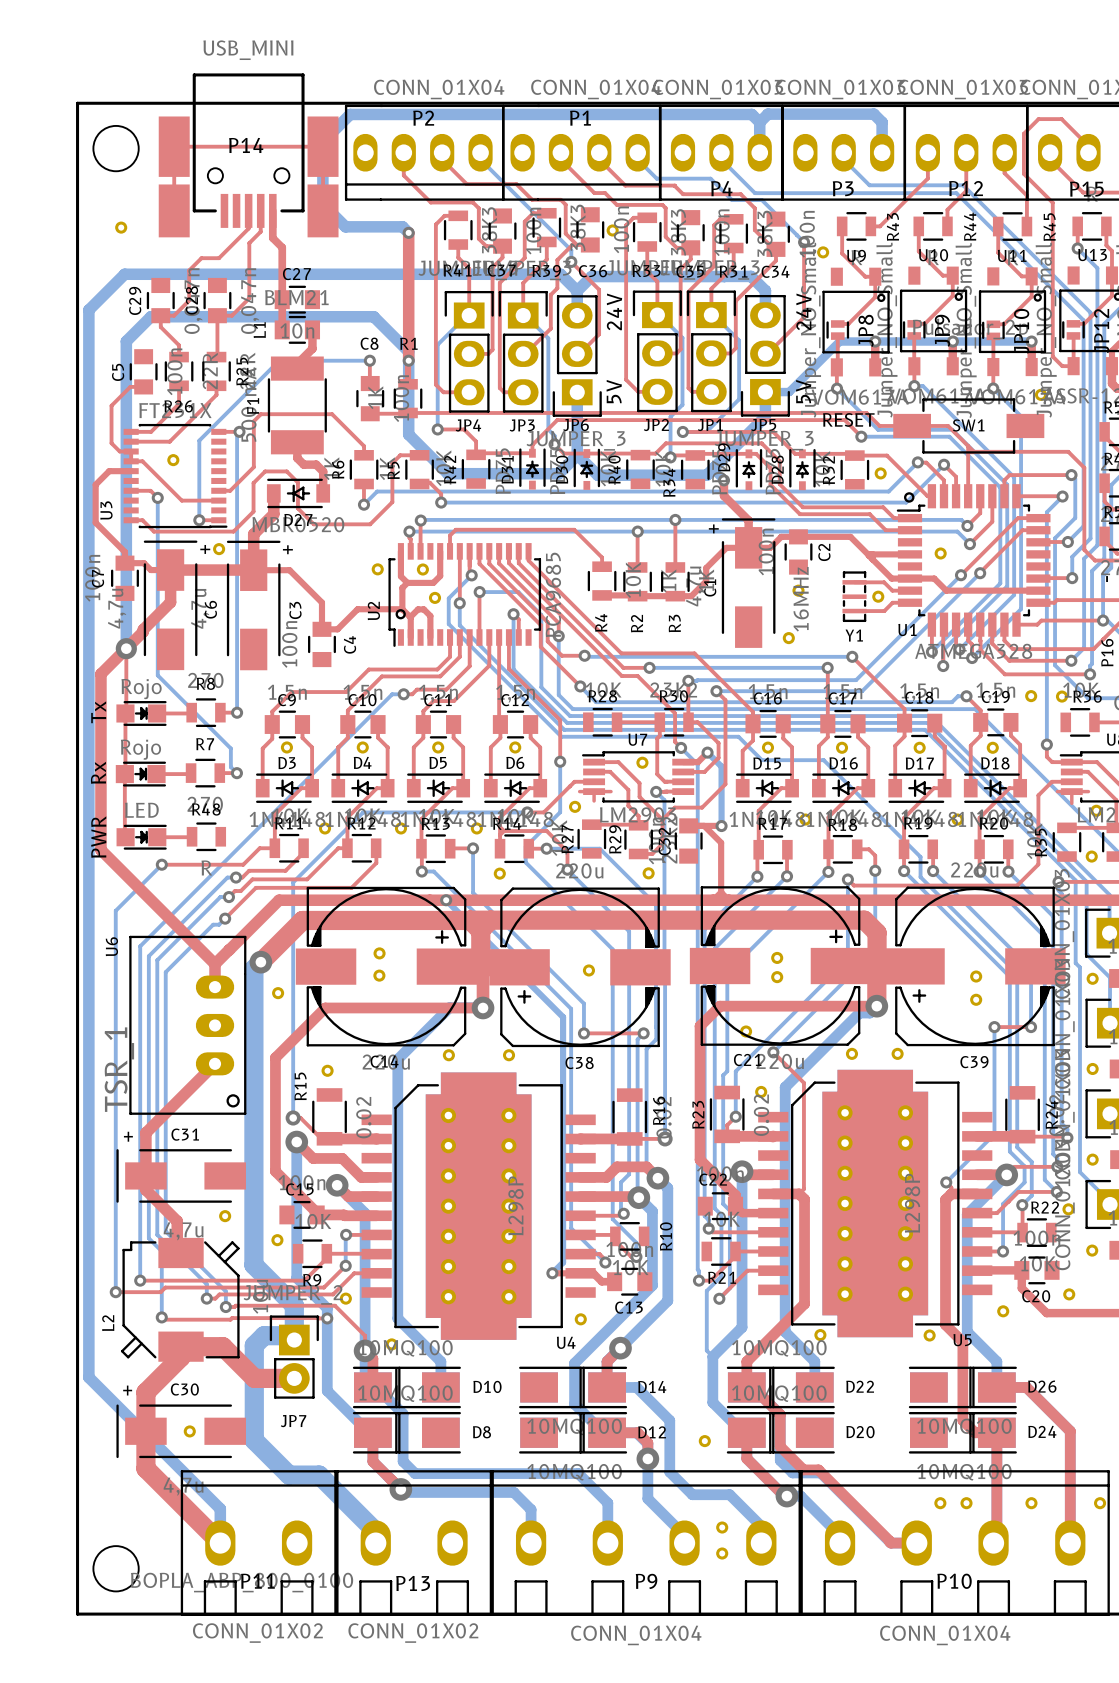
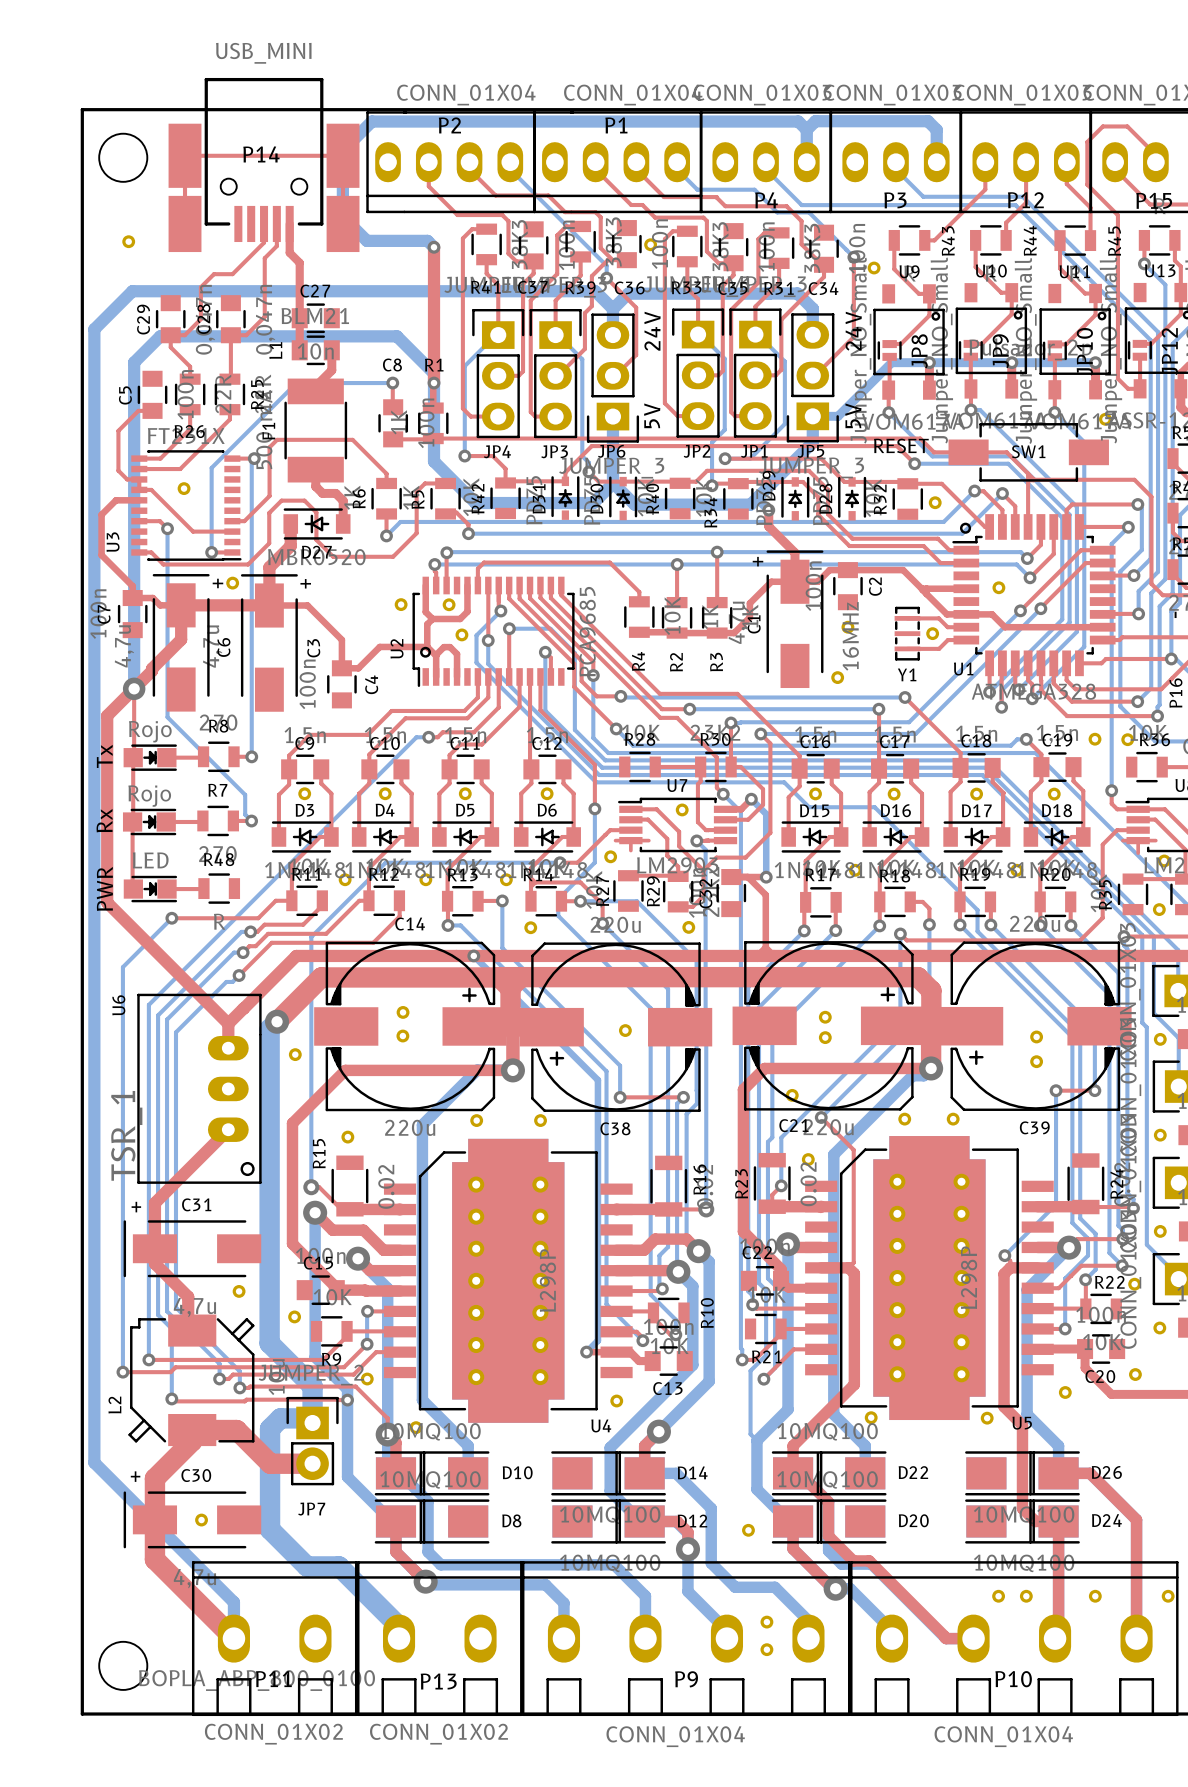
C14 name position: C14 (384, 1061) -> C14 (410, 924)

